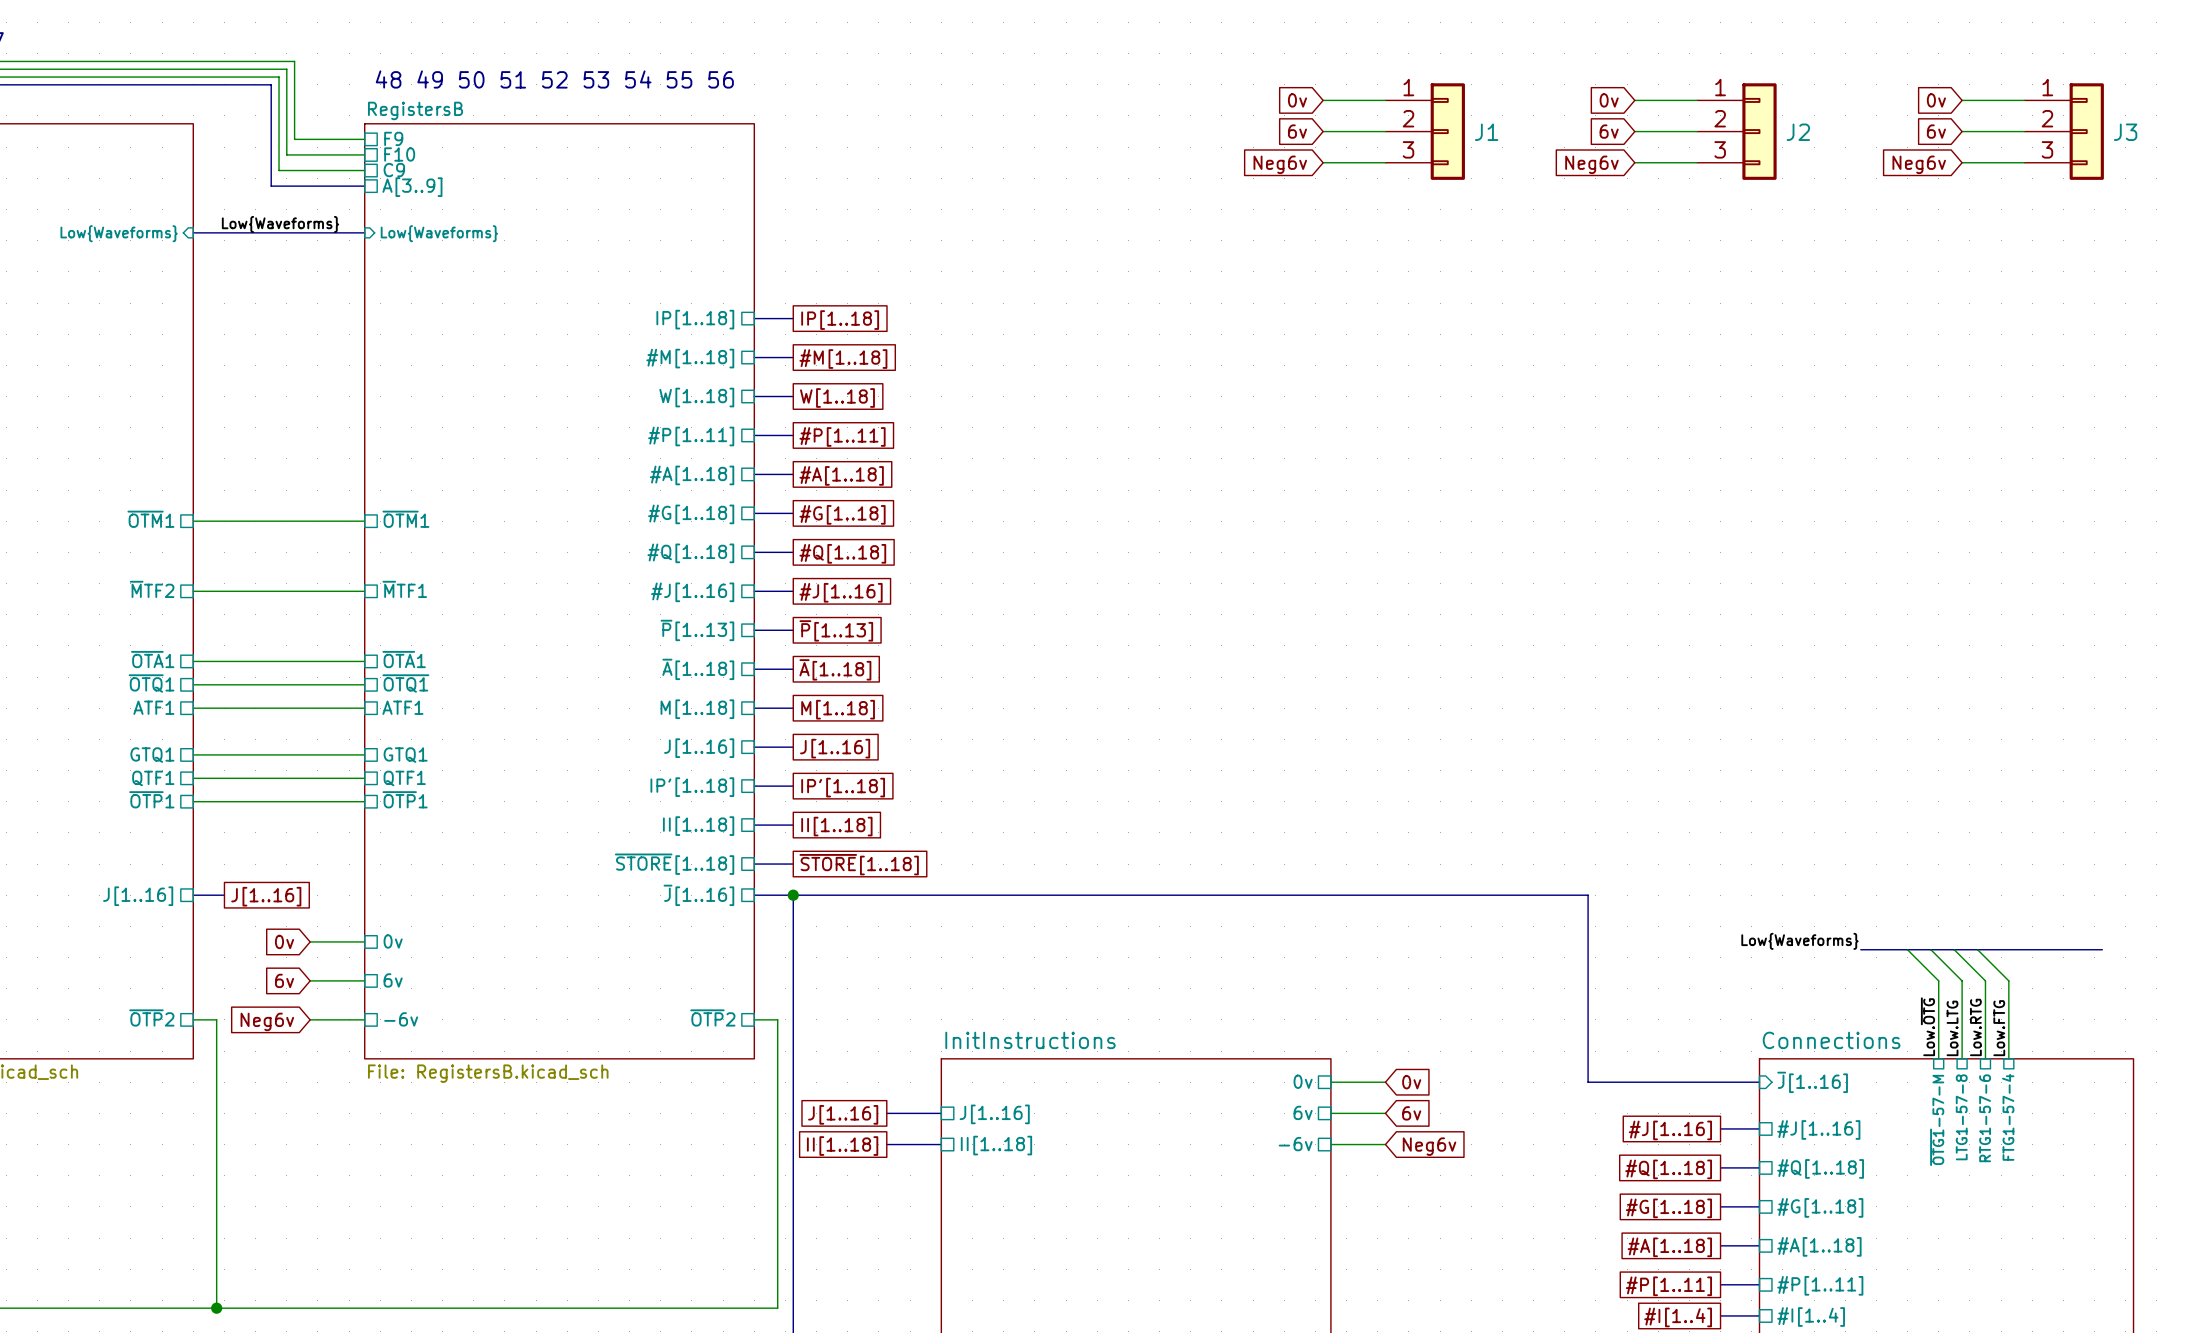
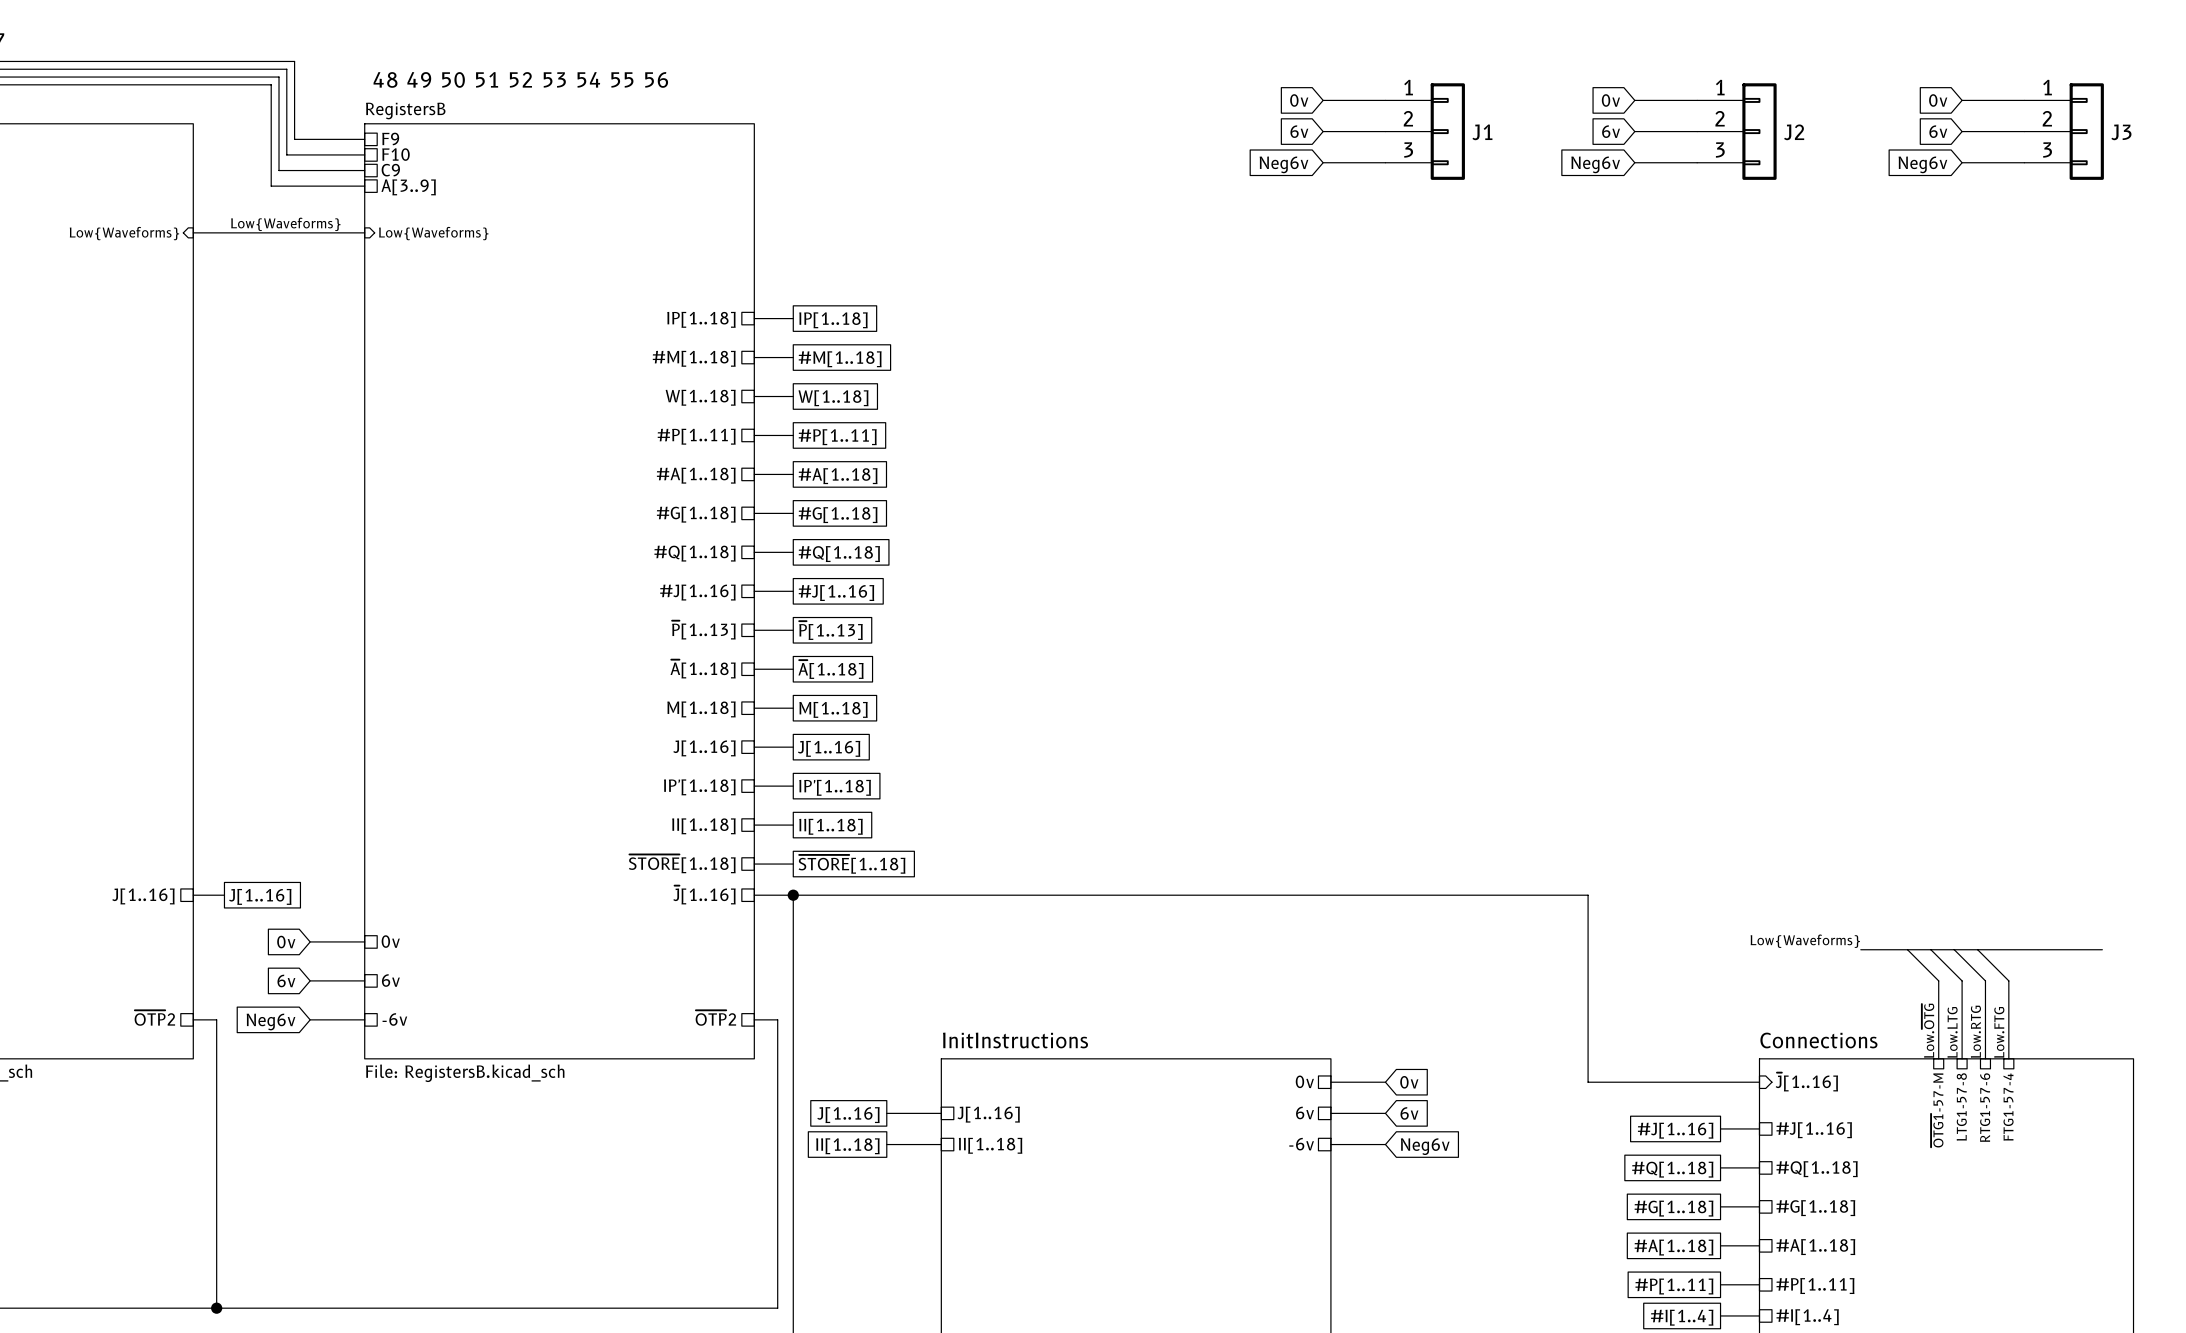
sheet pin: ~{OTM}1 (150, 519) -> none
sheet pin: ~{OTM}1 (405, 519) -> none
wire: (193, 521) (364, 521) -> none
sheet pin: ~{M}TF2 (152, 589) -> none
sheet pin: ~{M}TF1 (404, 589) -> none
wire: (193, 591) (364, 591) -> none
sheet pin: ~{OTA}1 (152, 659) -> none
sheet pin: ~{OTA}1 (404, 659) -> none
wire: (193, 661) (364, 661) -> none
sheet pin: ~{OTQ}1 (151, 683) -> none
sheet pin: ~{OTQ1} (405, 683) -> none
wire: (193, 684) (364, 684) -> none
sheet pin: ATF1 (153, 707) -> none
sheet pin: ATF1 (402, 707) -> none
wire: (193, 708) (364, 708) -> none
wire: (193, 754) (364, 754) -> none
sheet pin: GTQ1 (152, 755) -> none
sheet pin: GTQ1 (405, 755) -> none
sheet pin: QTF1 (153, 778) -> none
wire: (193, 778) (364, 778) -> none
sheet pin: QTF1 (404, 778) -> none
sheet pin: ~{OTP}1 (151, 799) -> none
sheet pin: ~{OTP}1 (405, 799) -> none
wire: (193, 801) (364, 801) -> none

